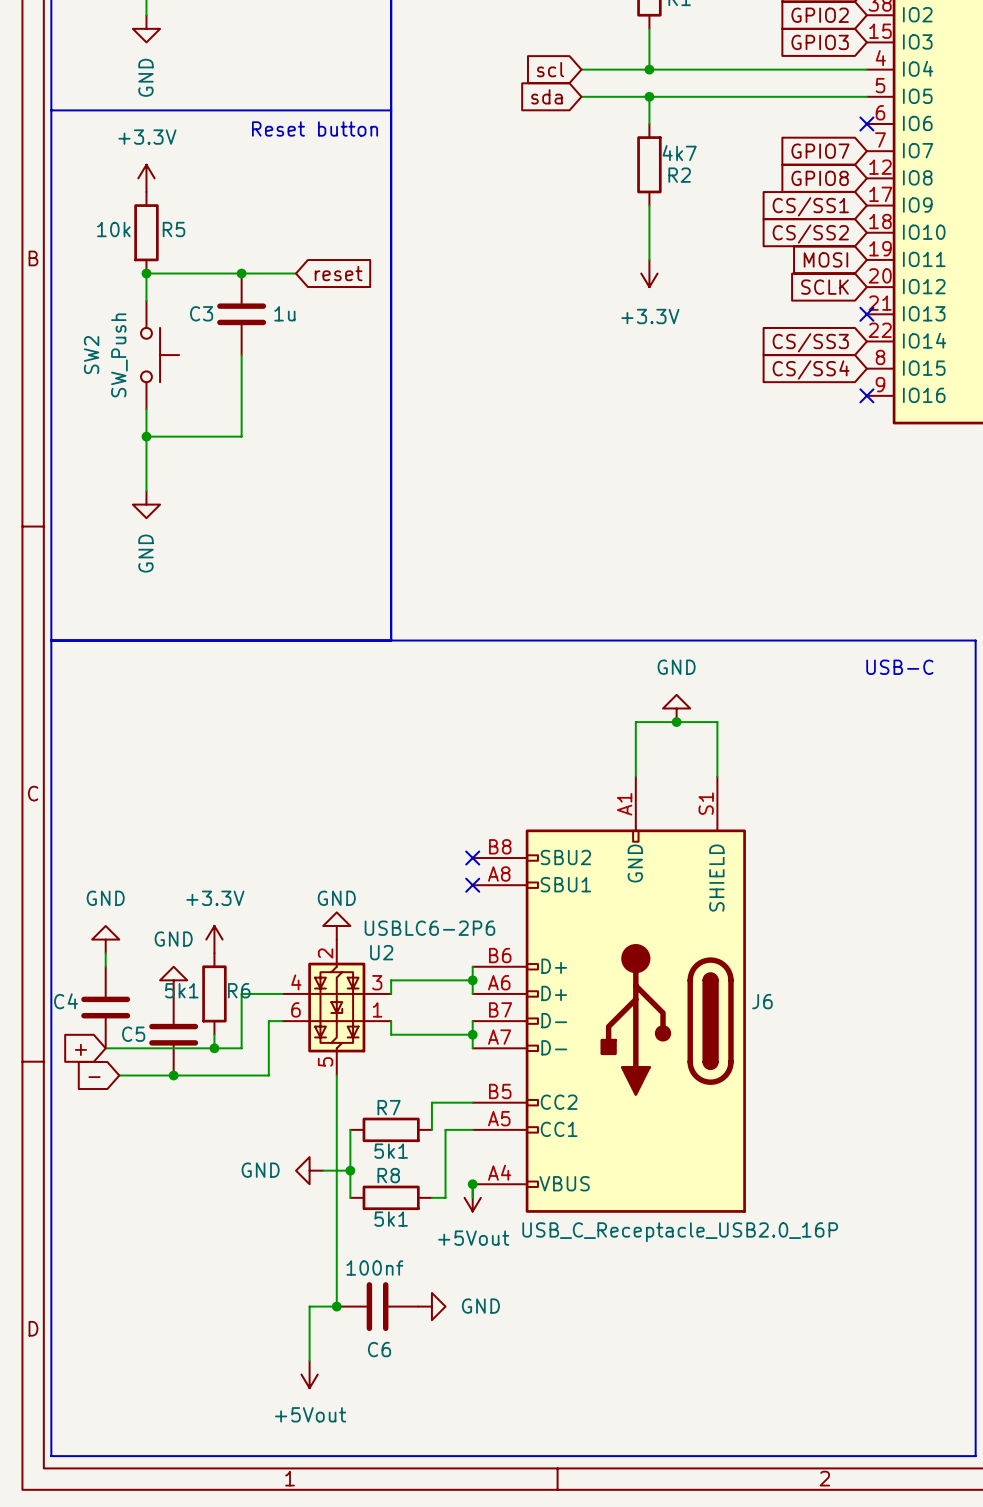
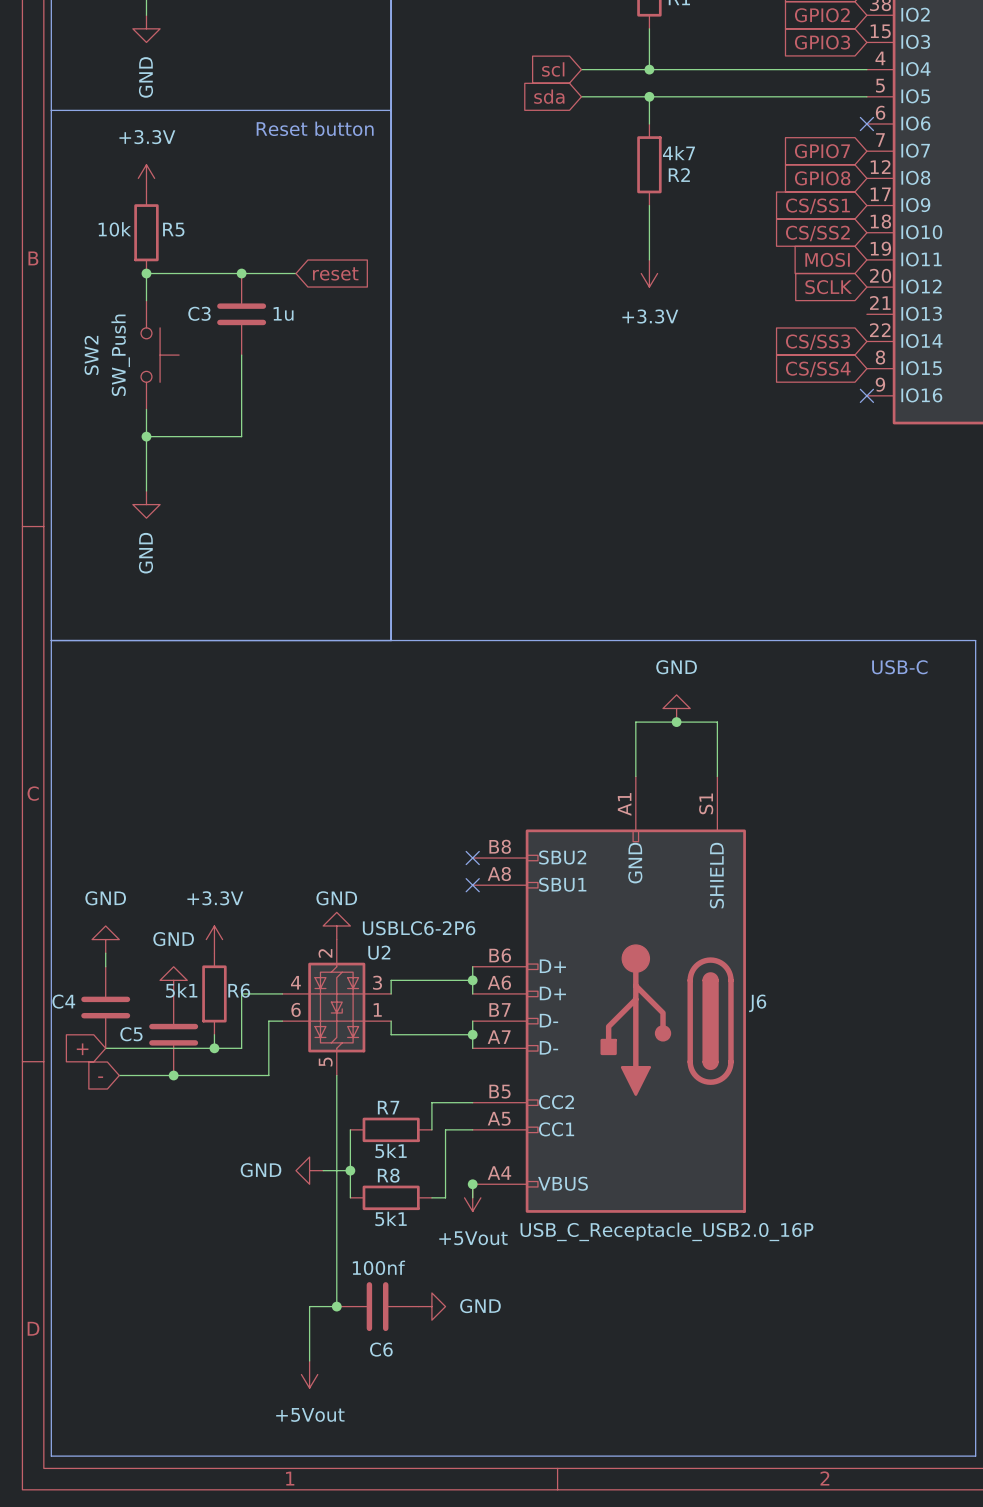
no-connect mark: (866, 314) -> none

